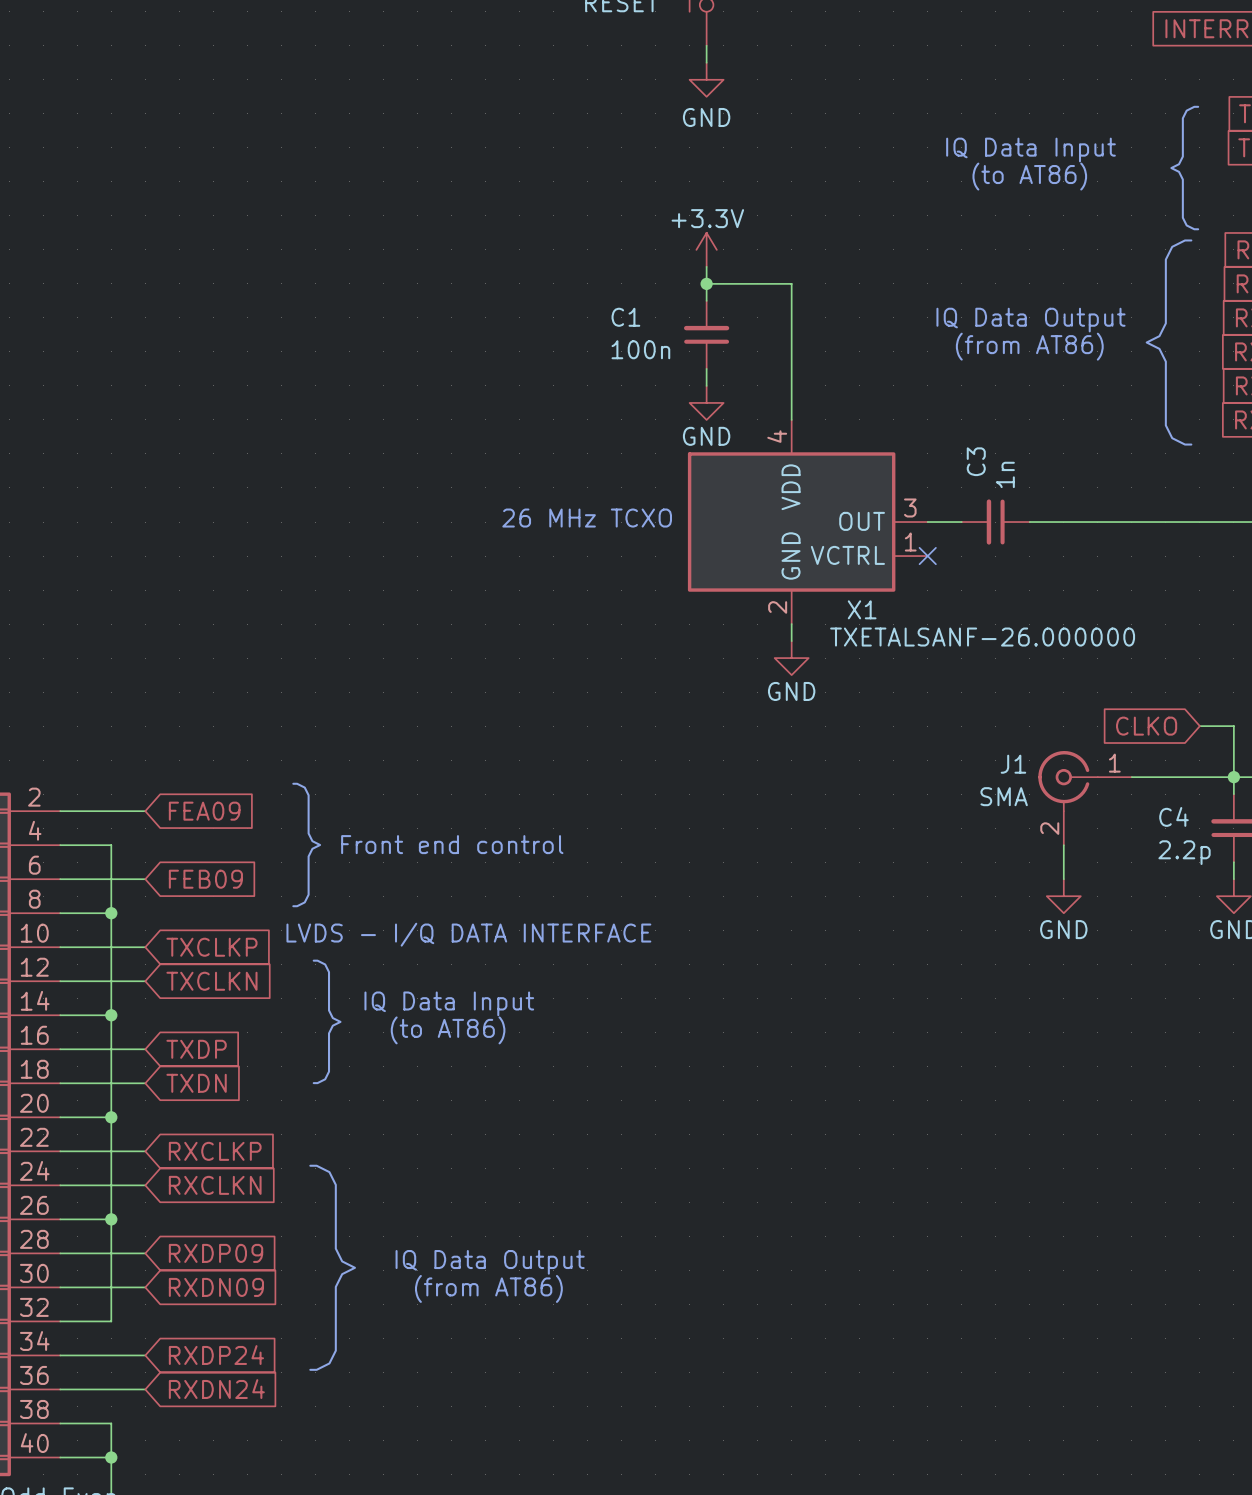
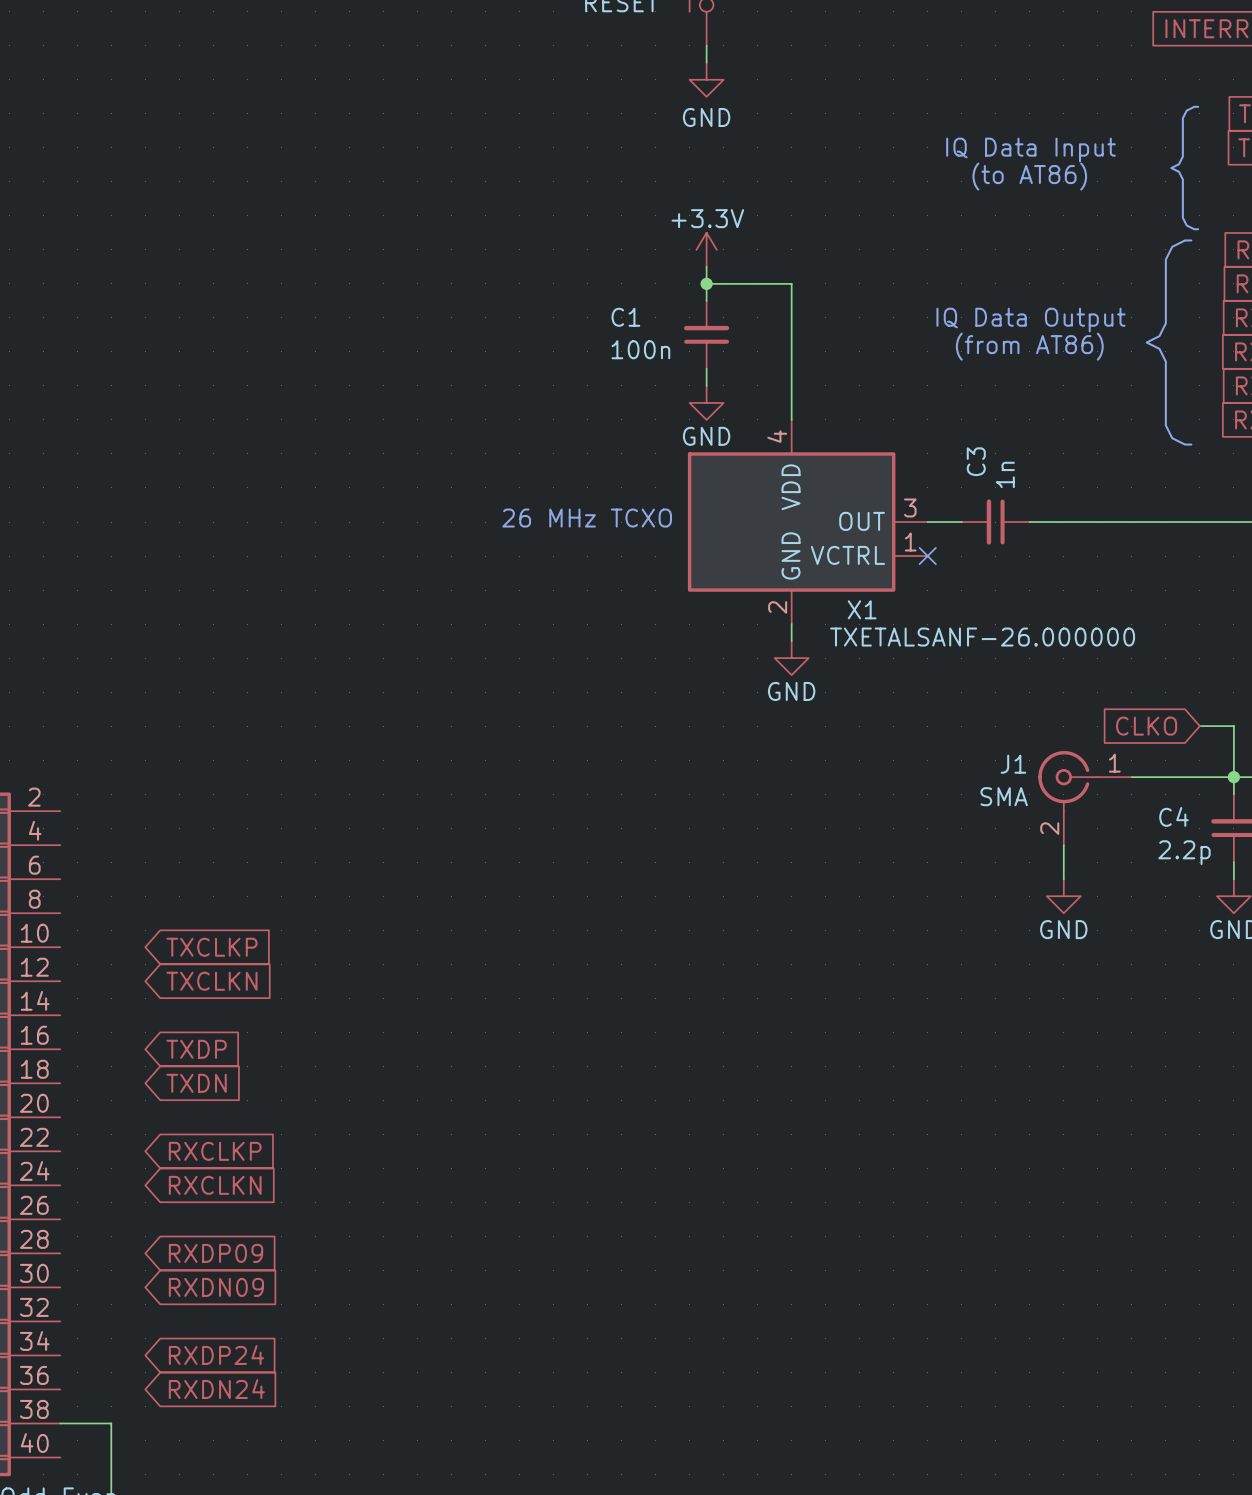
wire: (60, 811) (145, 811) -> none
global label: FEA09 (204, 811) -> none
text: } (306, 844) -> none
text: Front end control (452, 844) -> none
wire: (60, 845) (111, 845) (111, 1321) (60, 1321) -> none
wire: (60, 879) (145, 879) -> none
global label: FEB09 (205, 879) -> none
wire: (60, 913) (111, 913) -> none
junction: (111, 913) -> none
text: LVDS - I/Q DATA INTERFACE (468, 934) -> none
wire: (60, 947) (145, 947) -> none
wire: (60, 981) (145, 981) -> none
text: IQ Data Input (449, 1003) -> none
wire: (60, 1015) (111, 1015) -> none
junction: (111, 1015) -> none
text: } (327, 1021) -> none
text: (to AT86) (448, 1030) -> none
wire: (60, 1049) (145, 1049) -> none
wire: (60, 1083) (145, 1083) -> none
wire: (60, 1117) (111, 1117) -> none
junction: (111, 1117) -> none
wire: (60, 1151) (145, 1151) -> none
wire: (60, 1185) (145, 1185) -> none
wire: (60, 1219) (111, 1219) -> none
junction: (111, 1219) -> none
wire: (60, 1253) (145, 1253) -> none
text: IQ Data Output (490, 1262) -> none
text: } (332, 1267) -> none
wire: (60, 1287) (145, 1287) -> none
text: (from AT86) (488, 1288) -> none
wire: (60, 1355) (145, 1355) -> none
wire: (60, 1389) (145, 1389) -> none
wire: (60, 1457) (111, 1457) -> none
junction: (111, 1457) -> none

